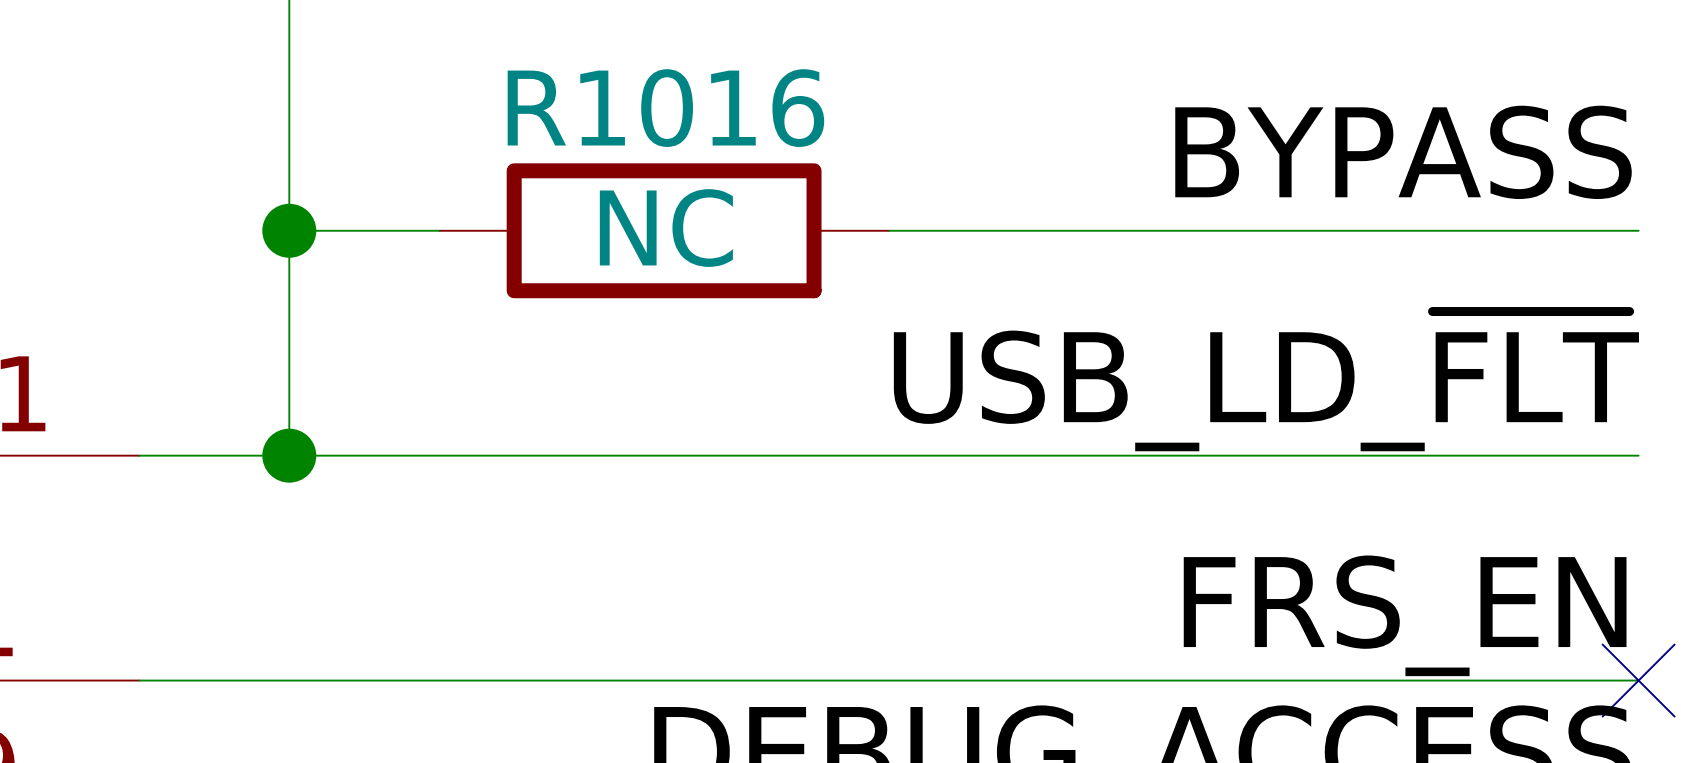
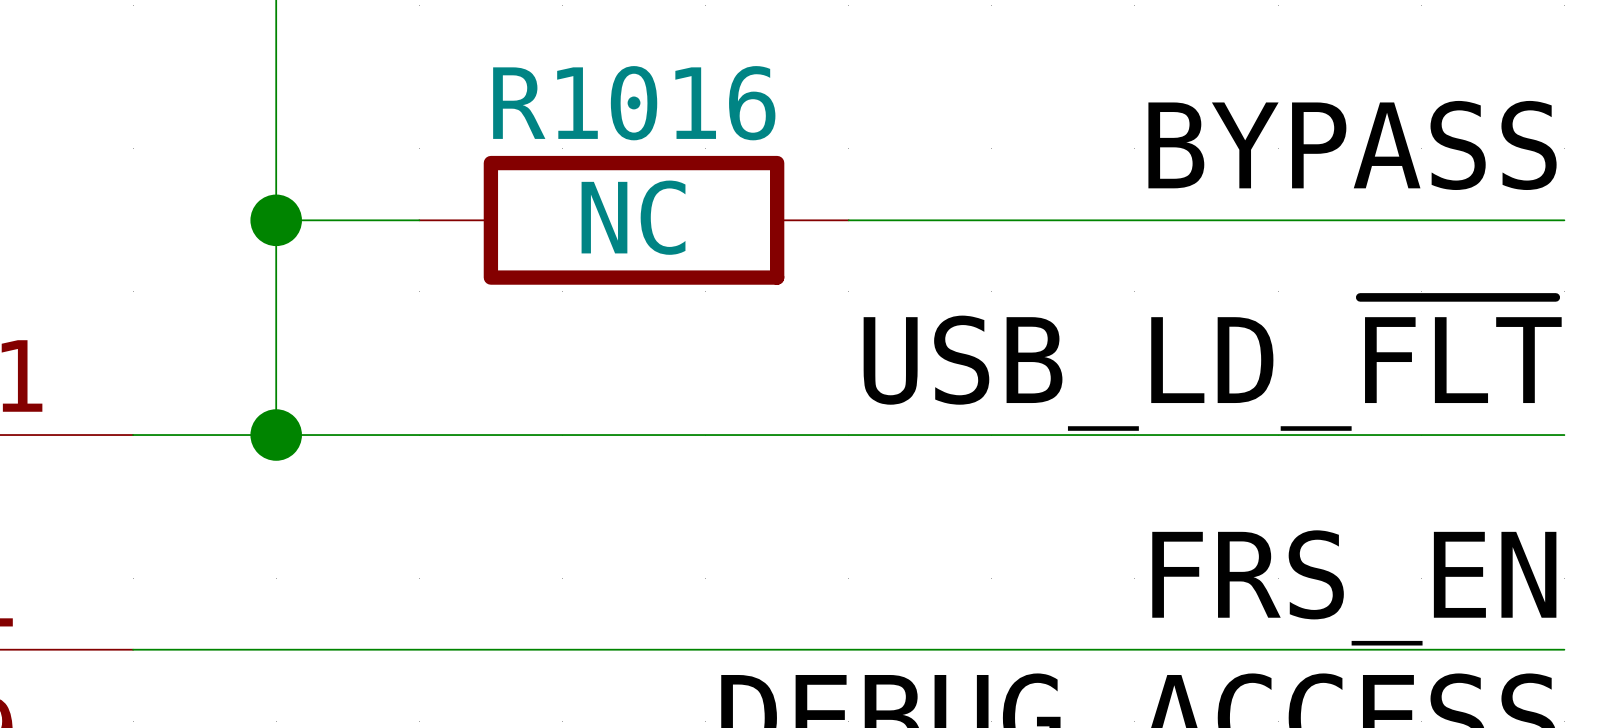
no-connect mark: (1638, 680) -> none

